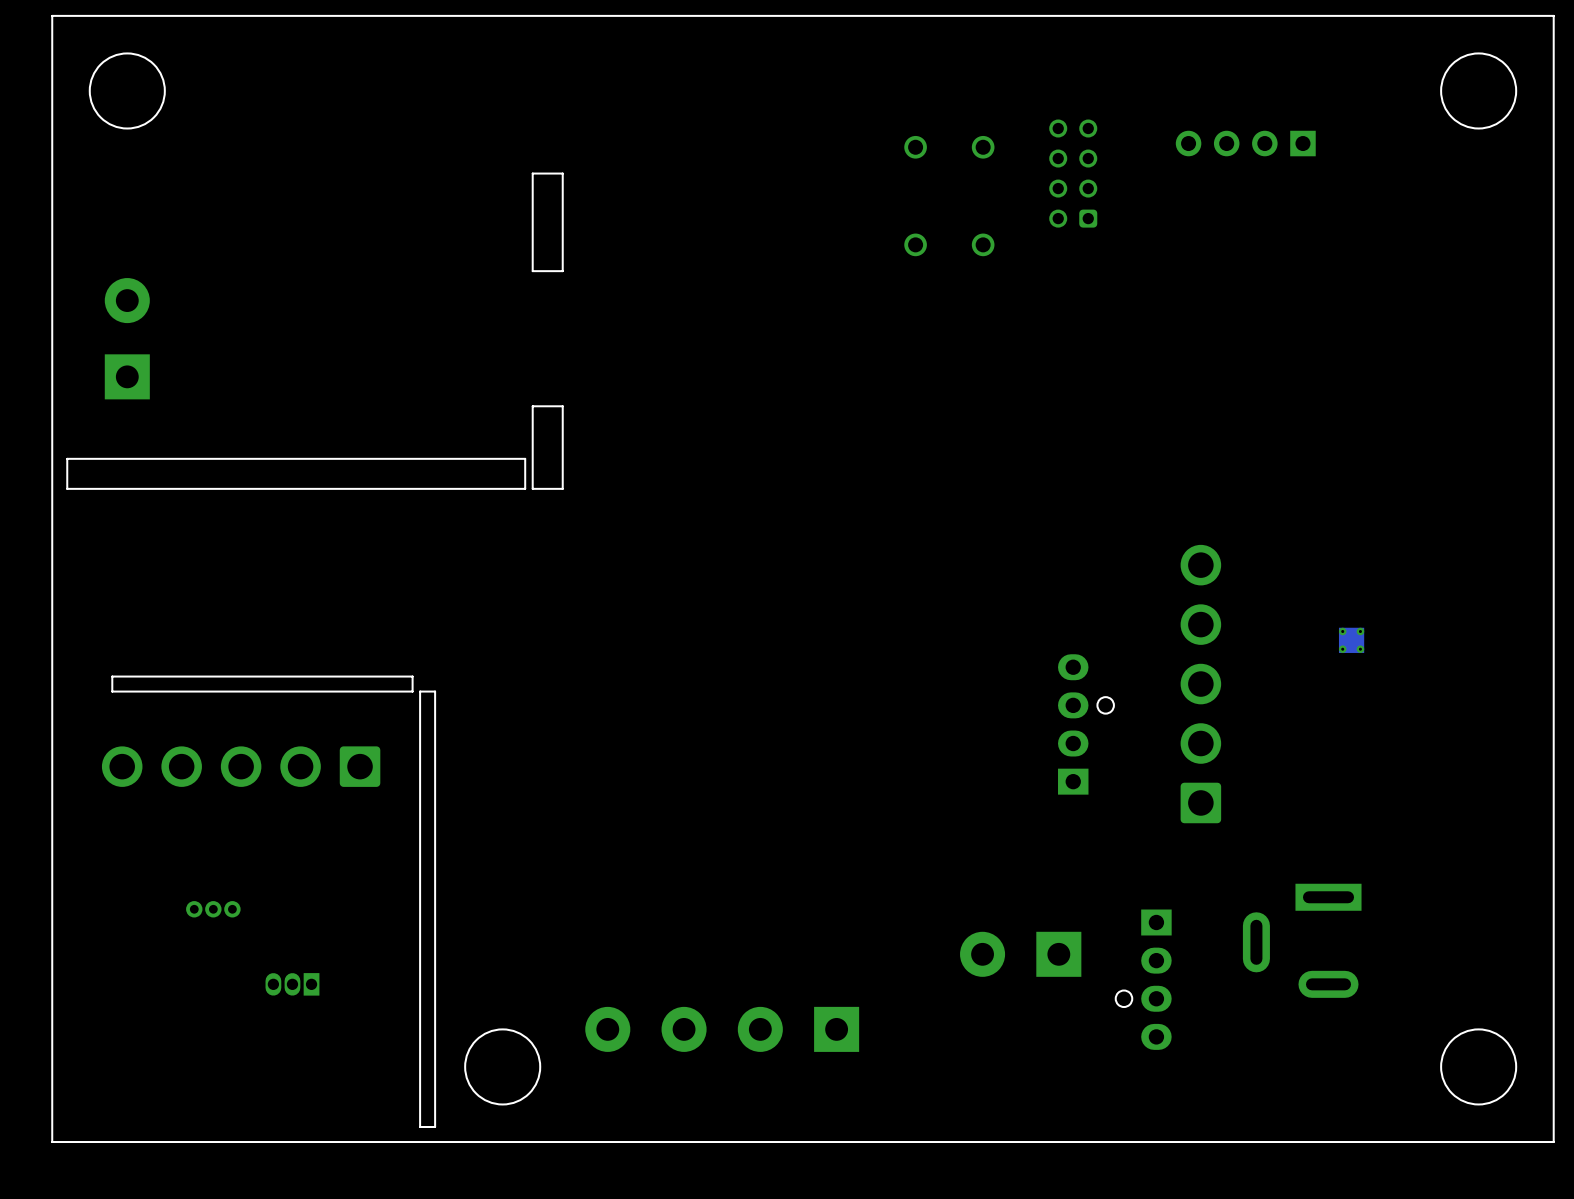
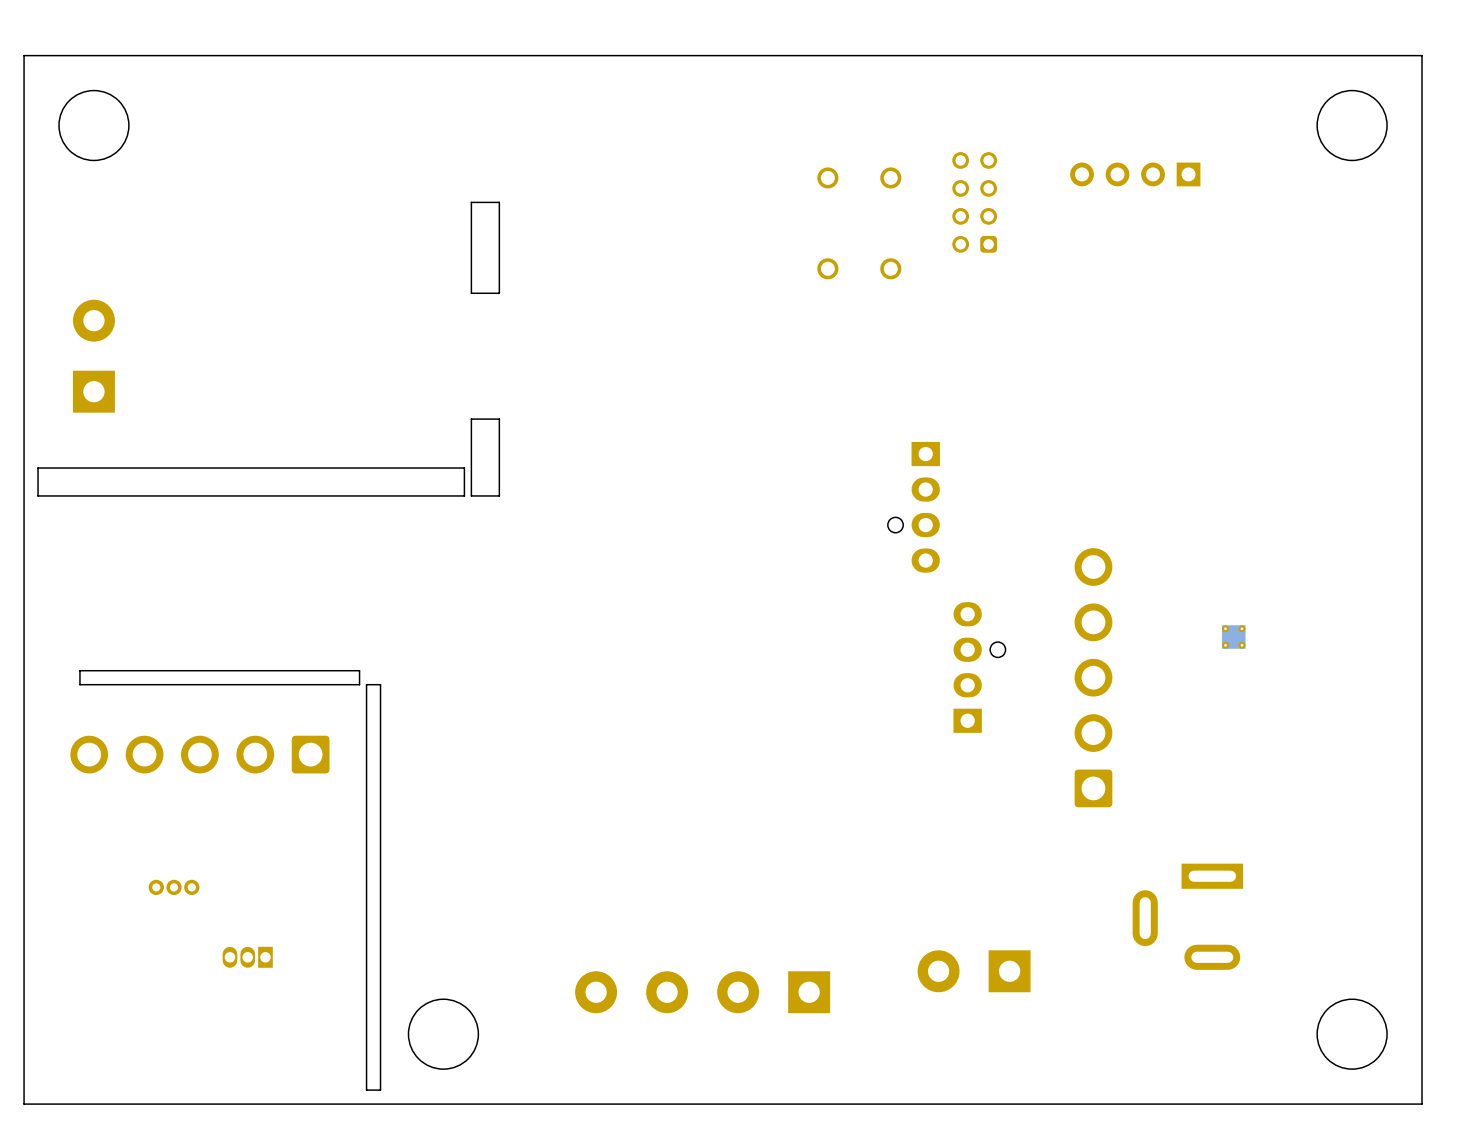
part: none -> (913, 507)
part position: (1085, 724) -> (979, 667)
part position: (1020, 954) -> (974, 971)
part: (1143, 979) -> none
part position: (722, 1029) -> (702, 992)

